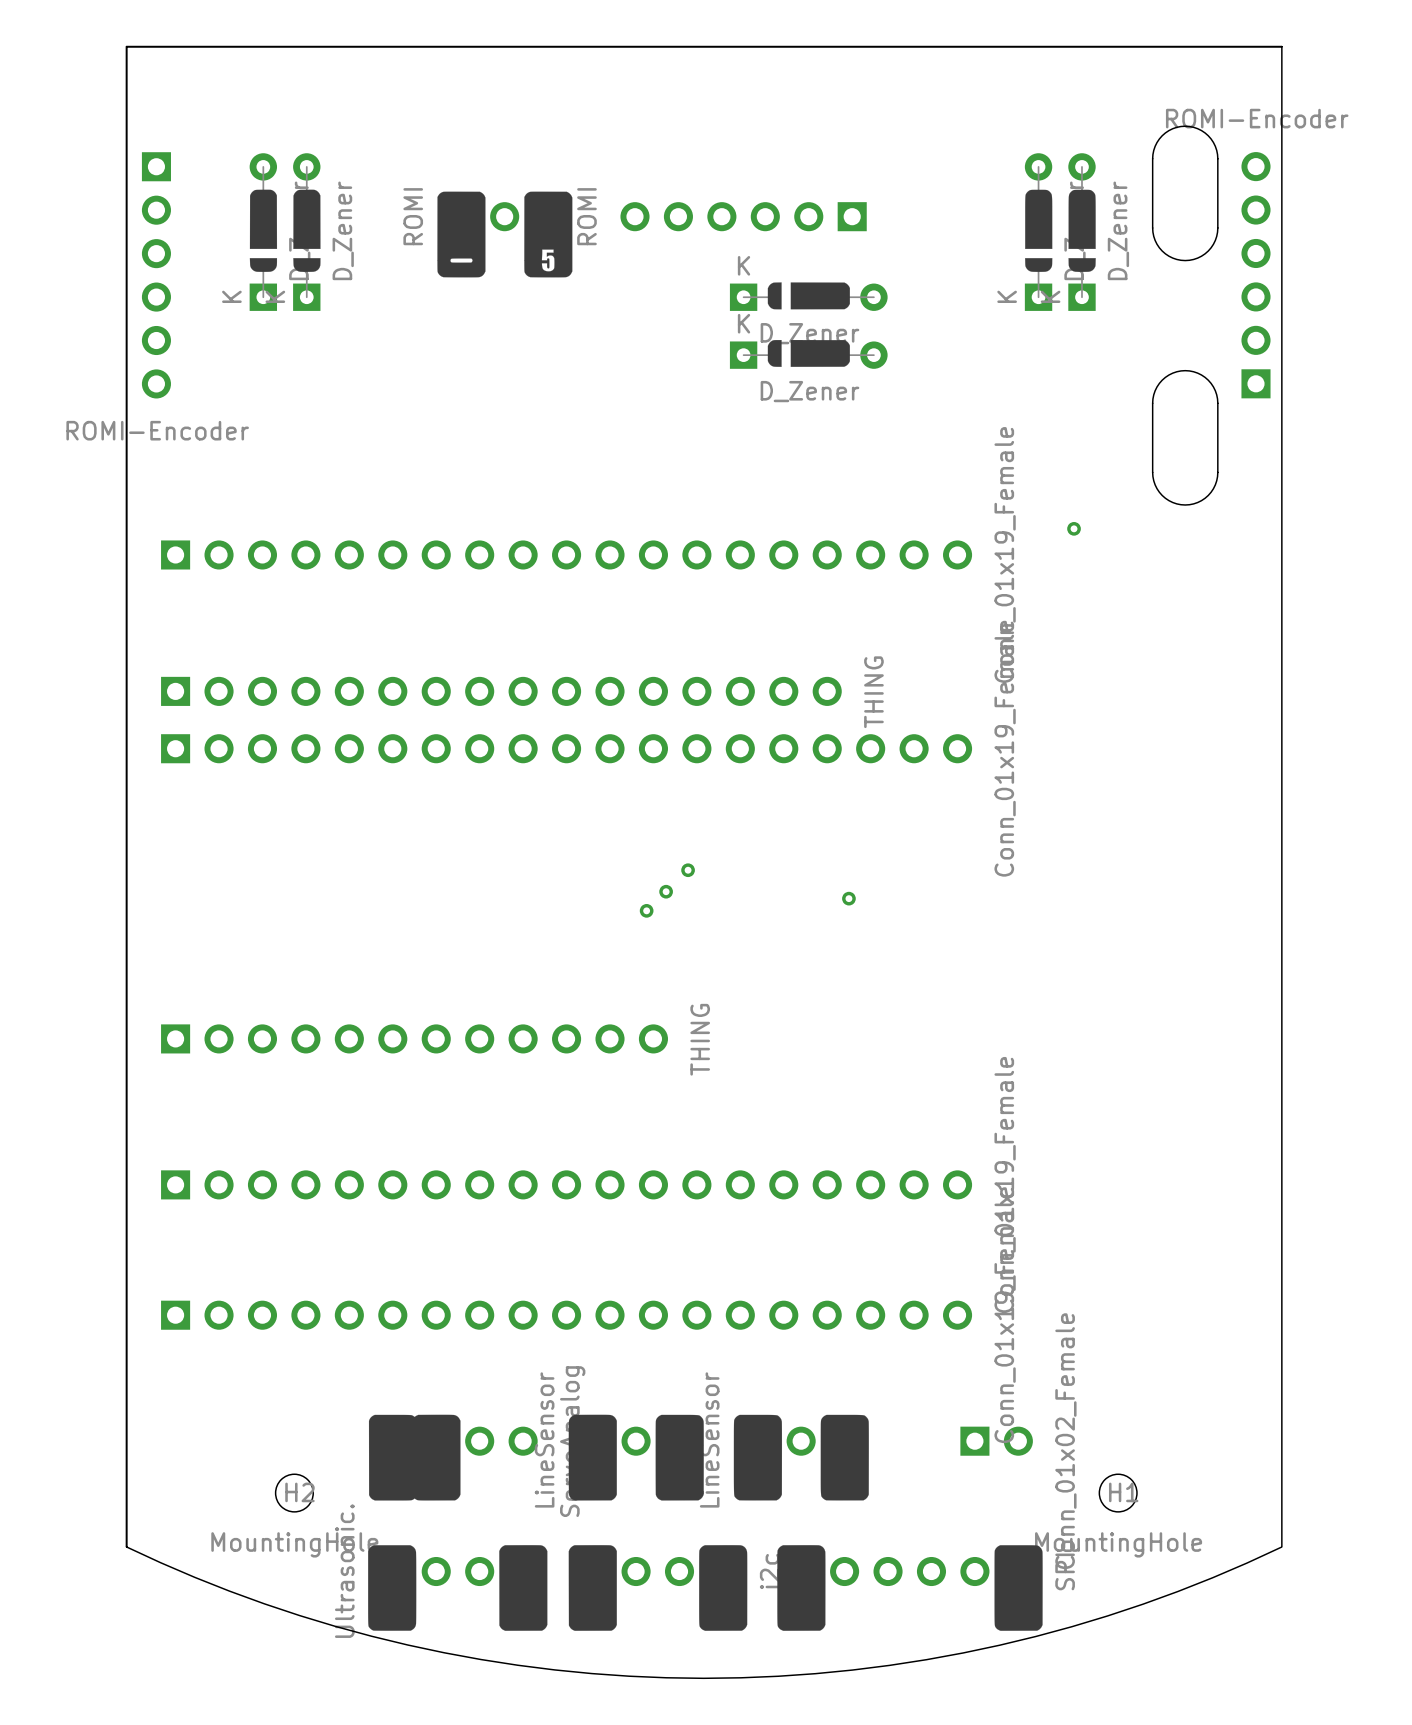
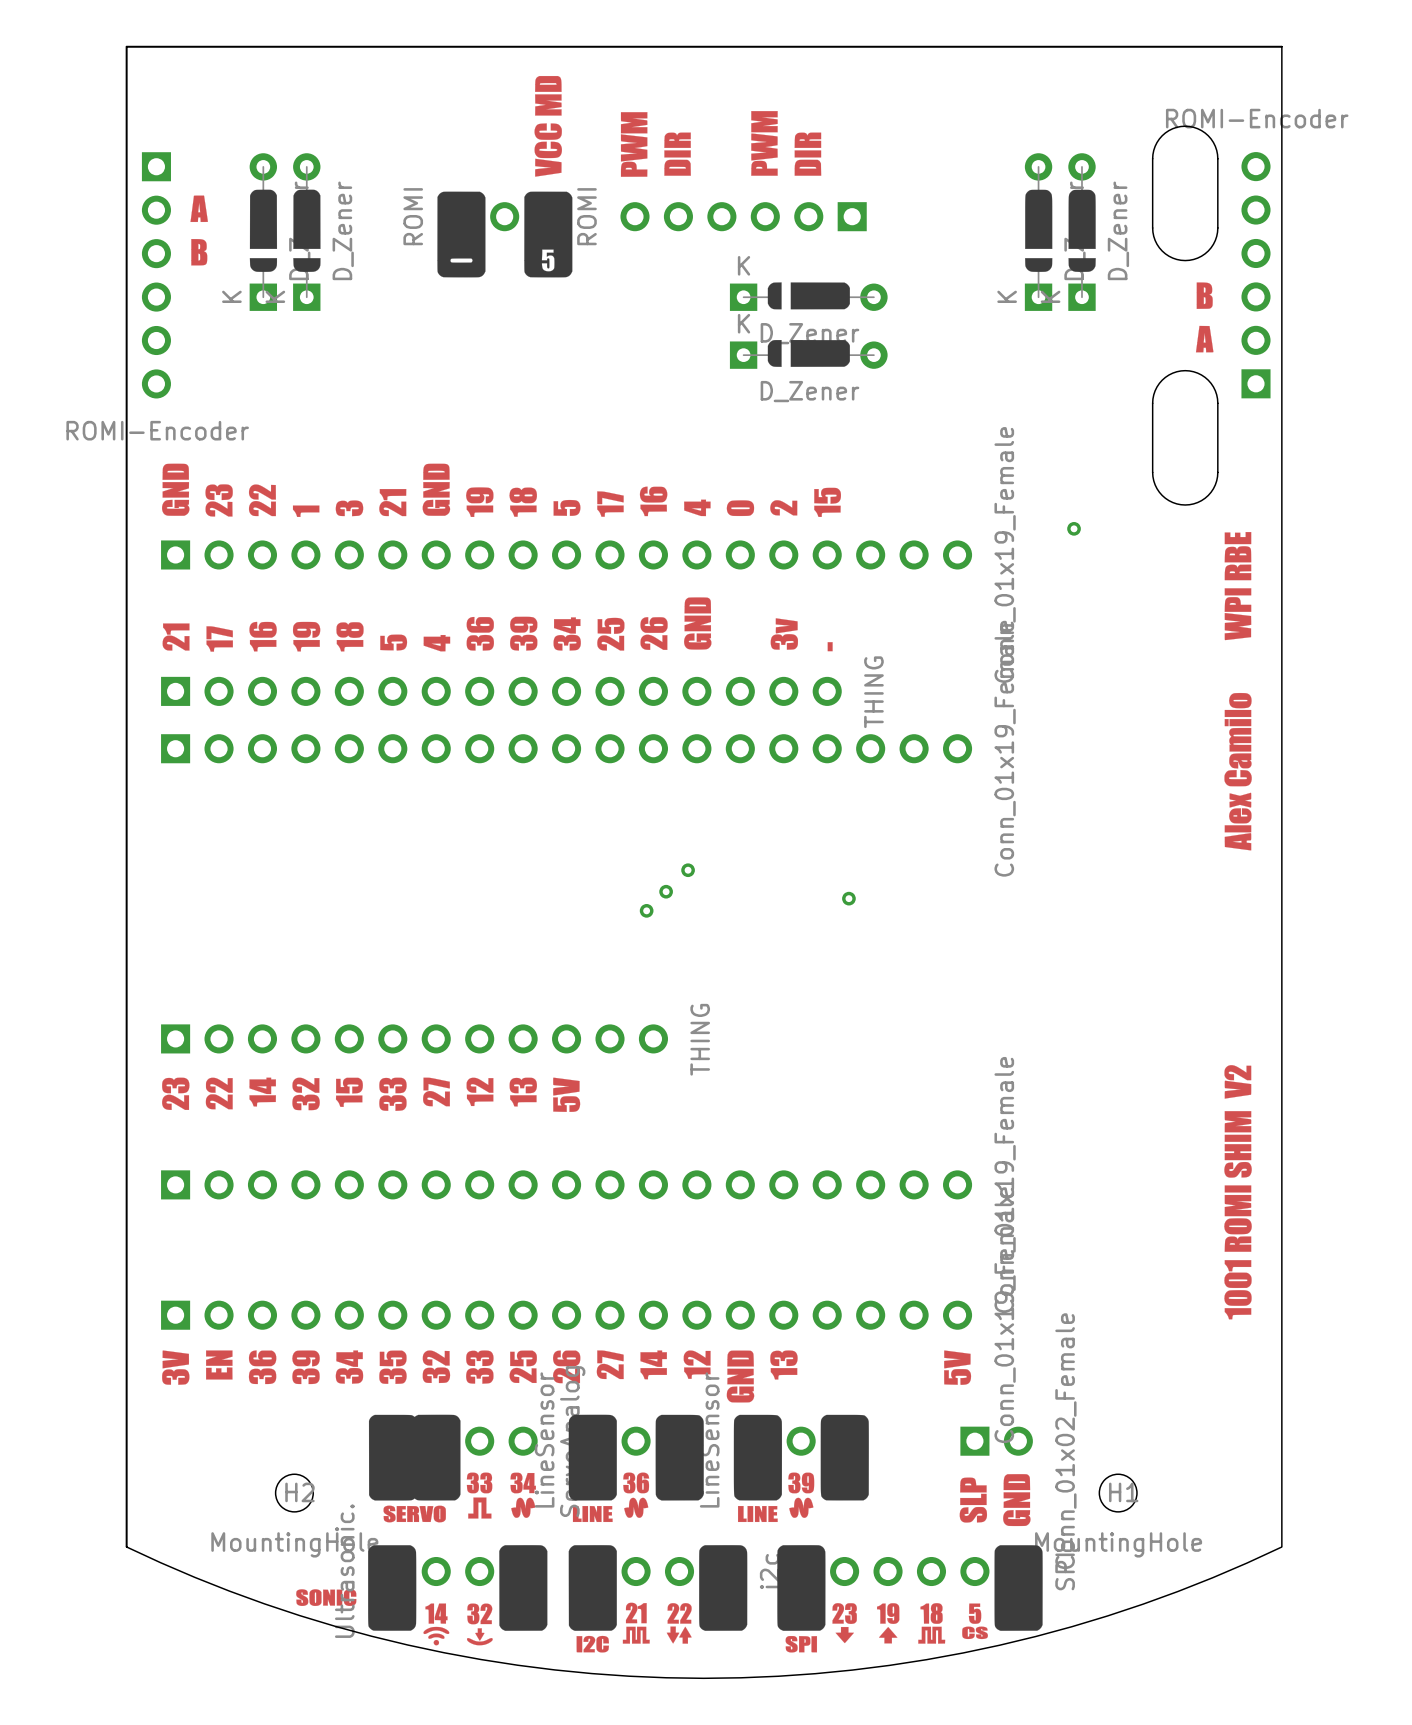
drawing: none -> [161, 75, 1252, 1653]

